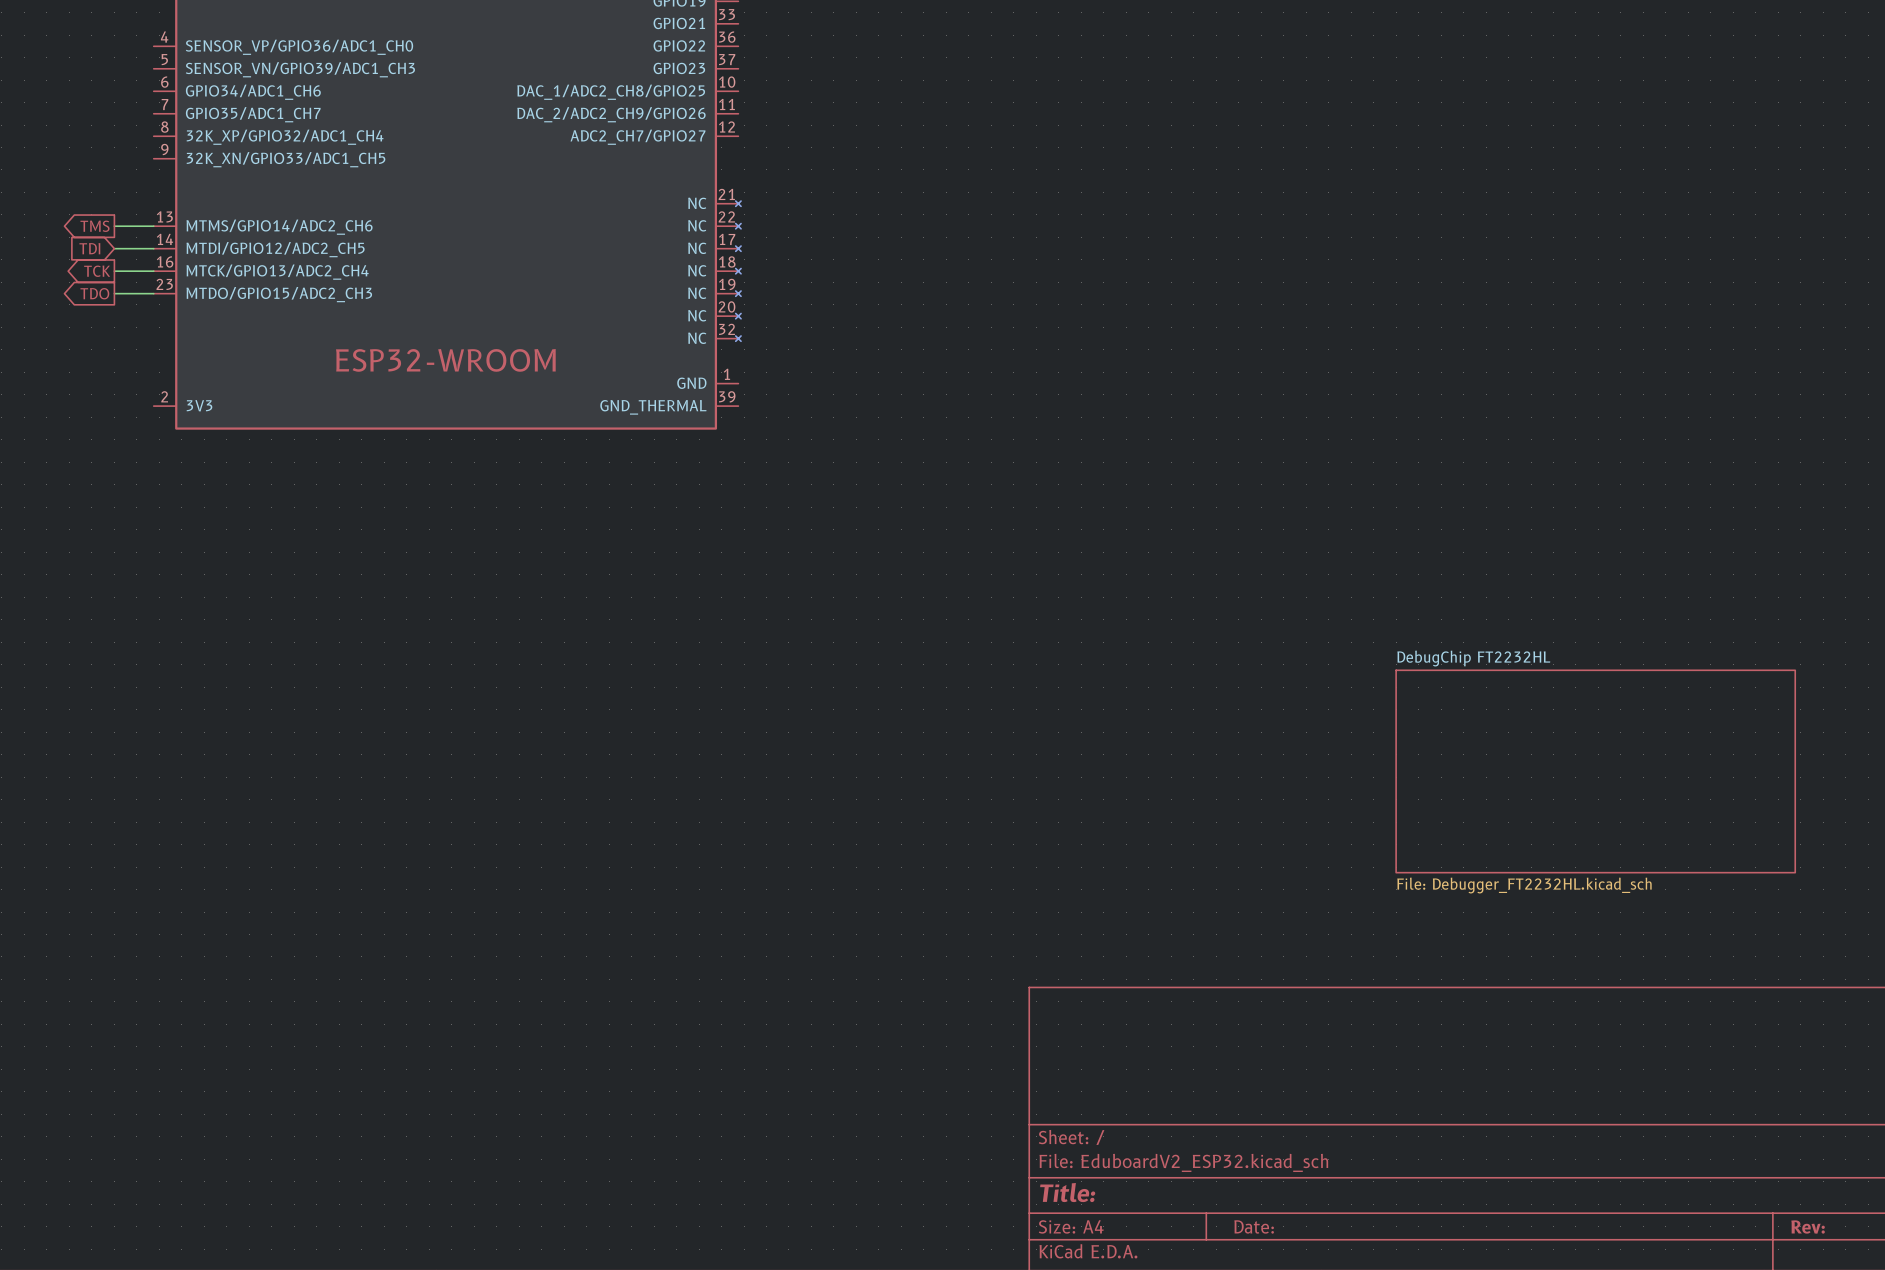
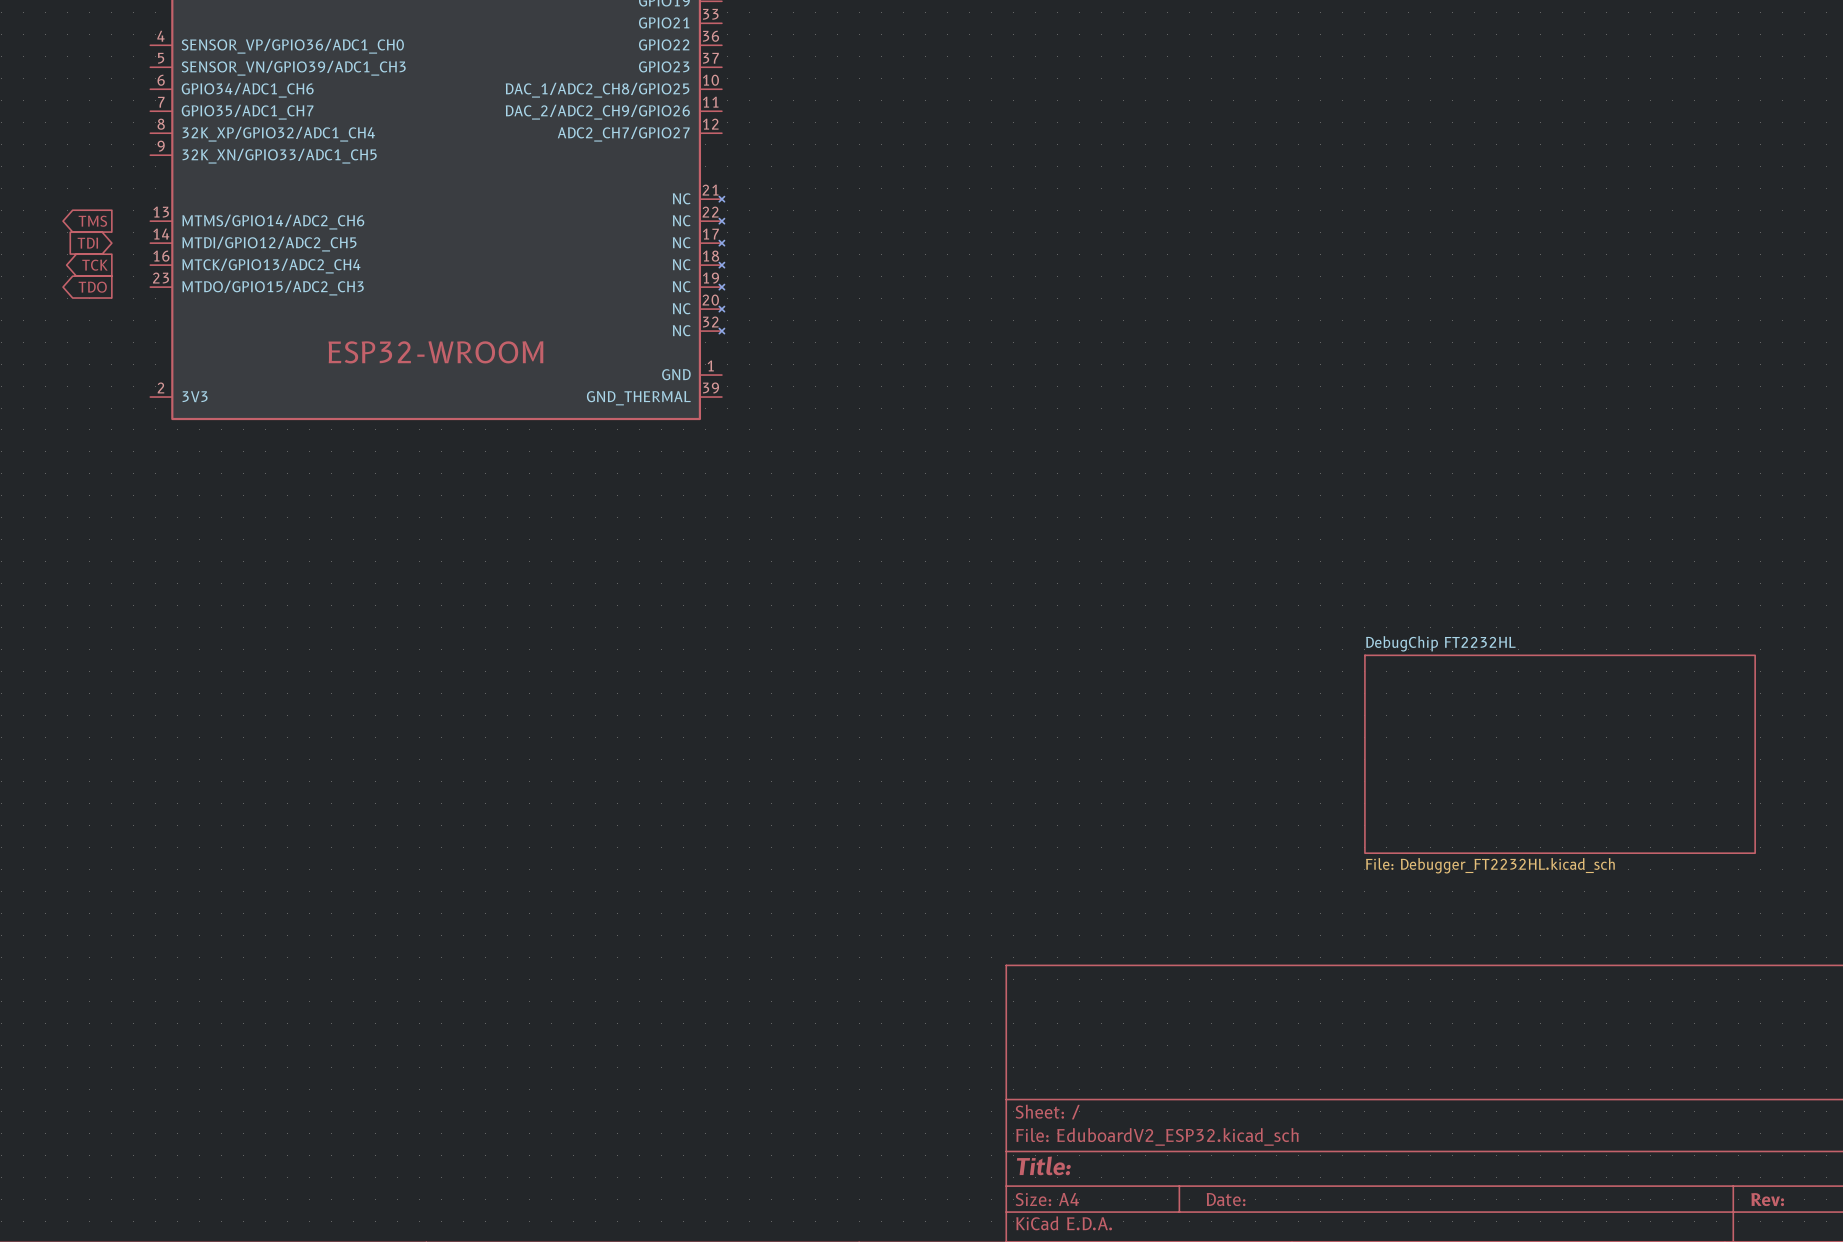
wire: (114, 226) (153, 226) -> none
wire: (114, 248) (153, 248) -> none
wire: (114, 271) (153, 271) -> none
wire: (114, 293) (153, 293) -> none

